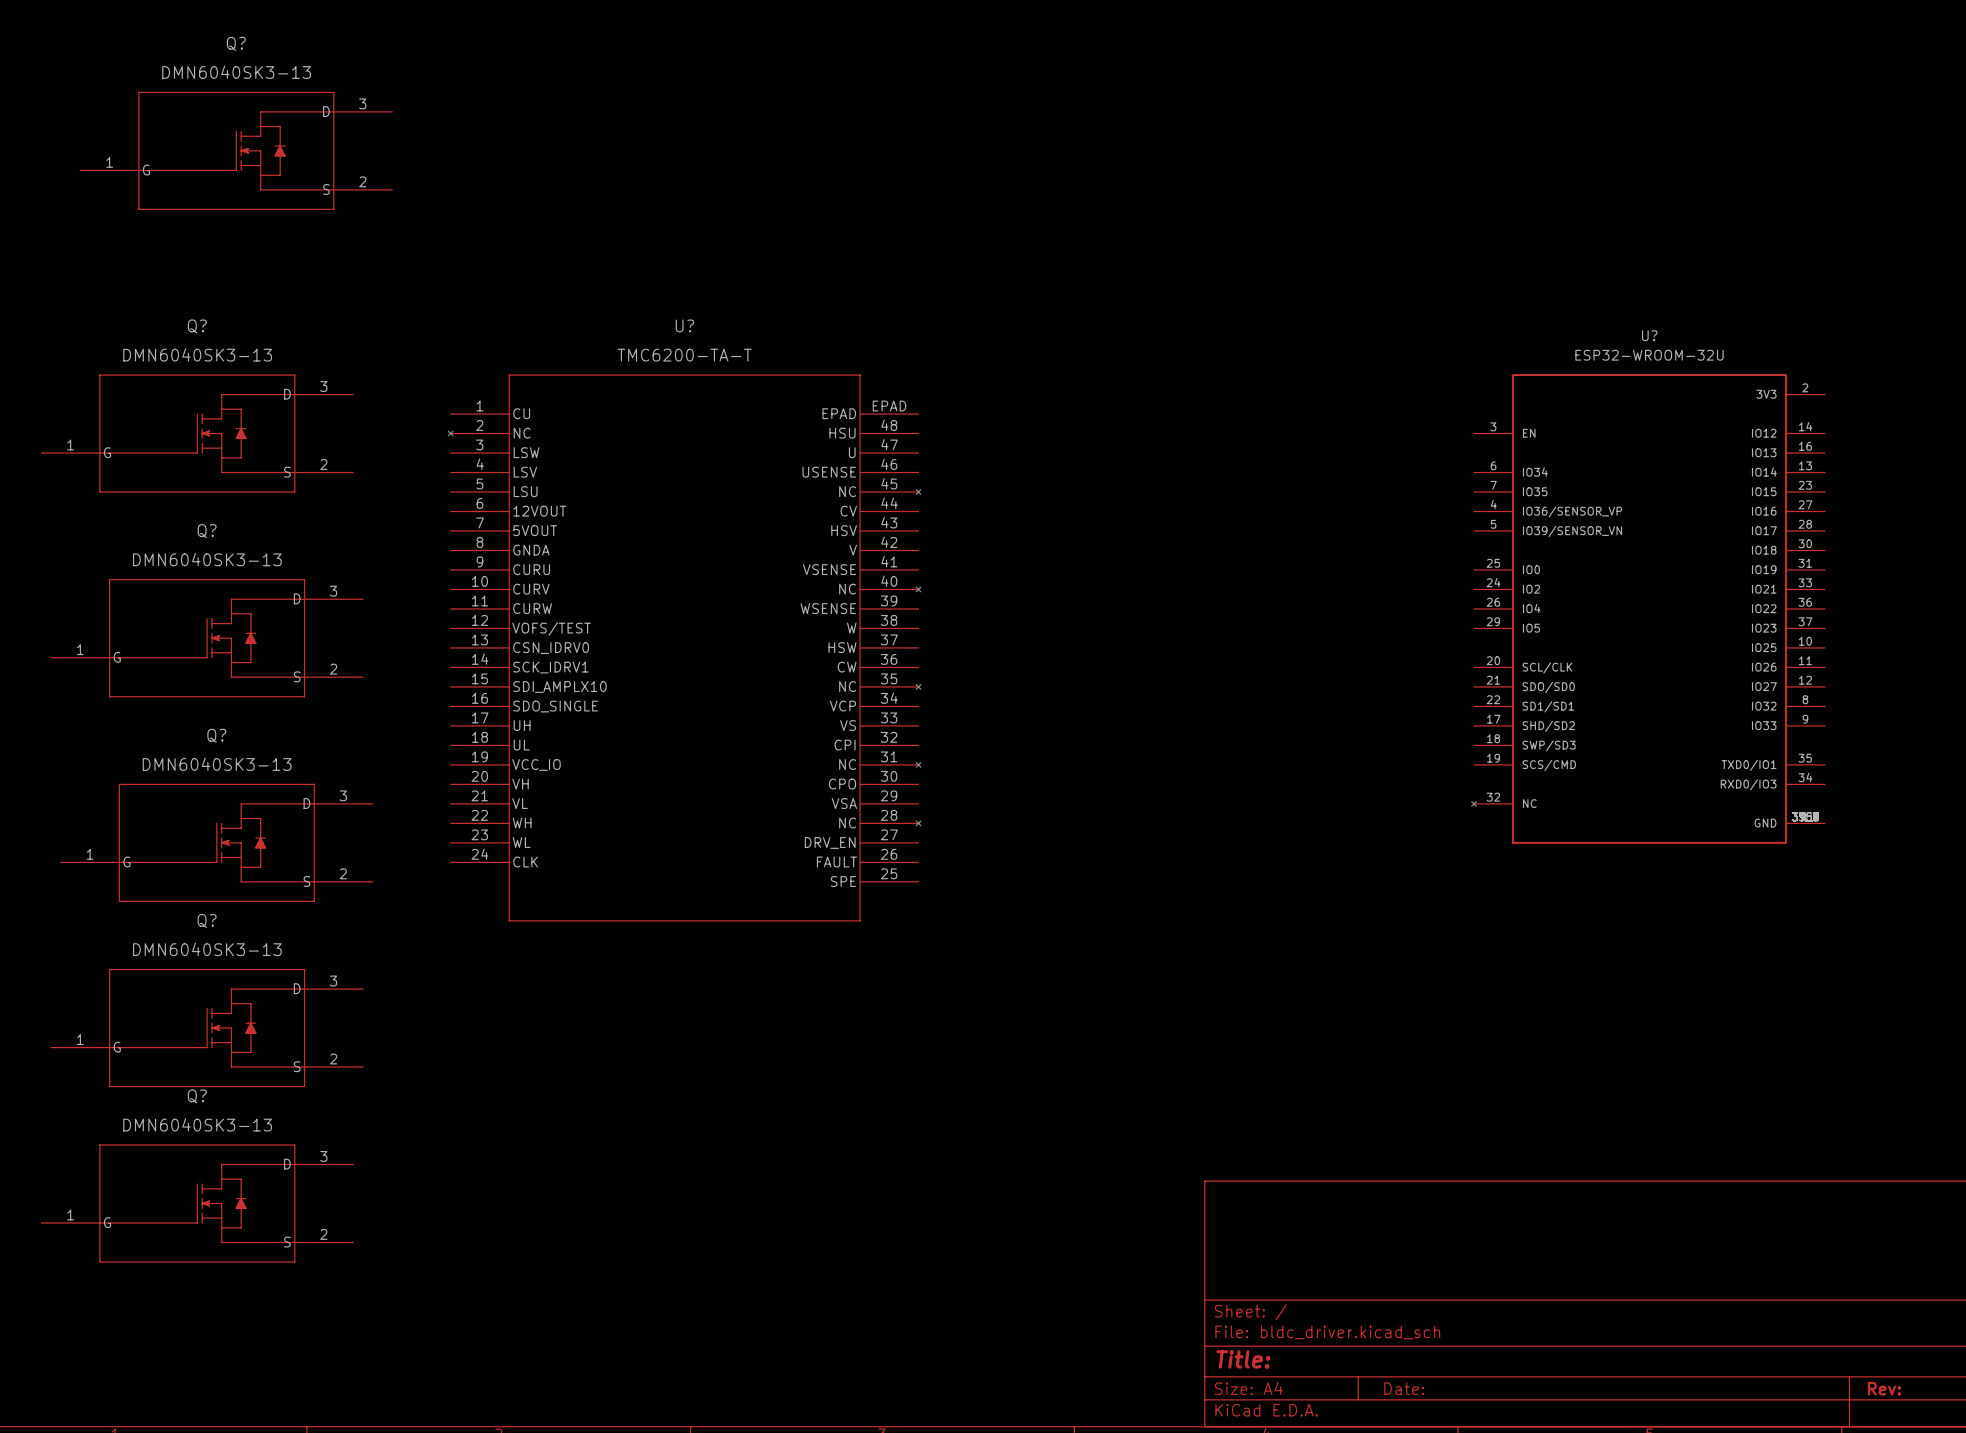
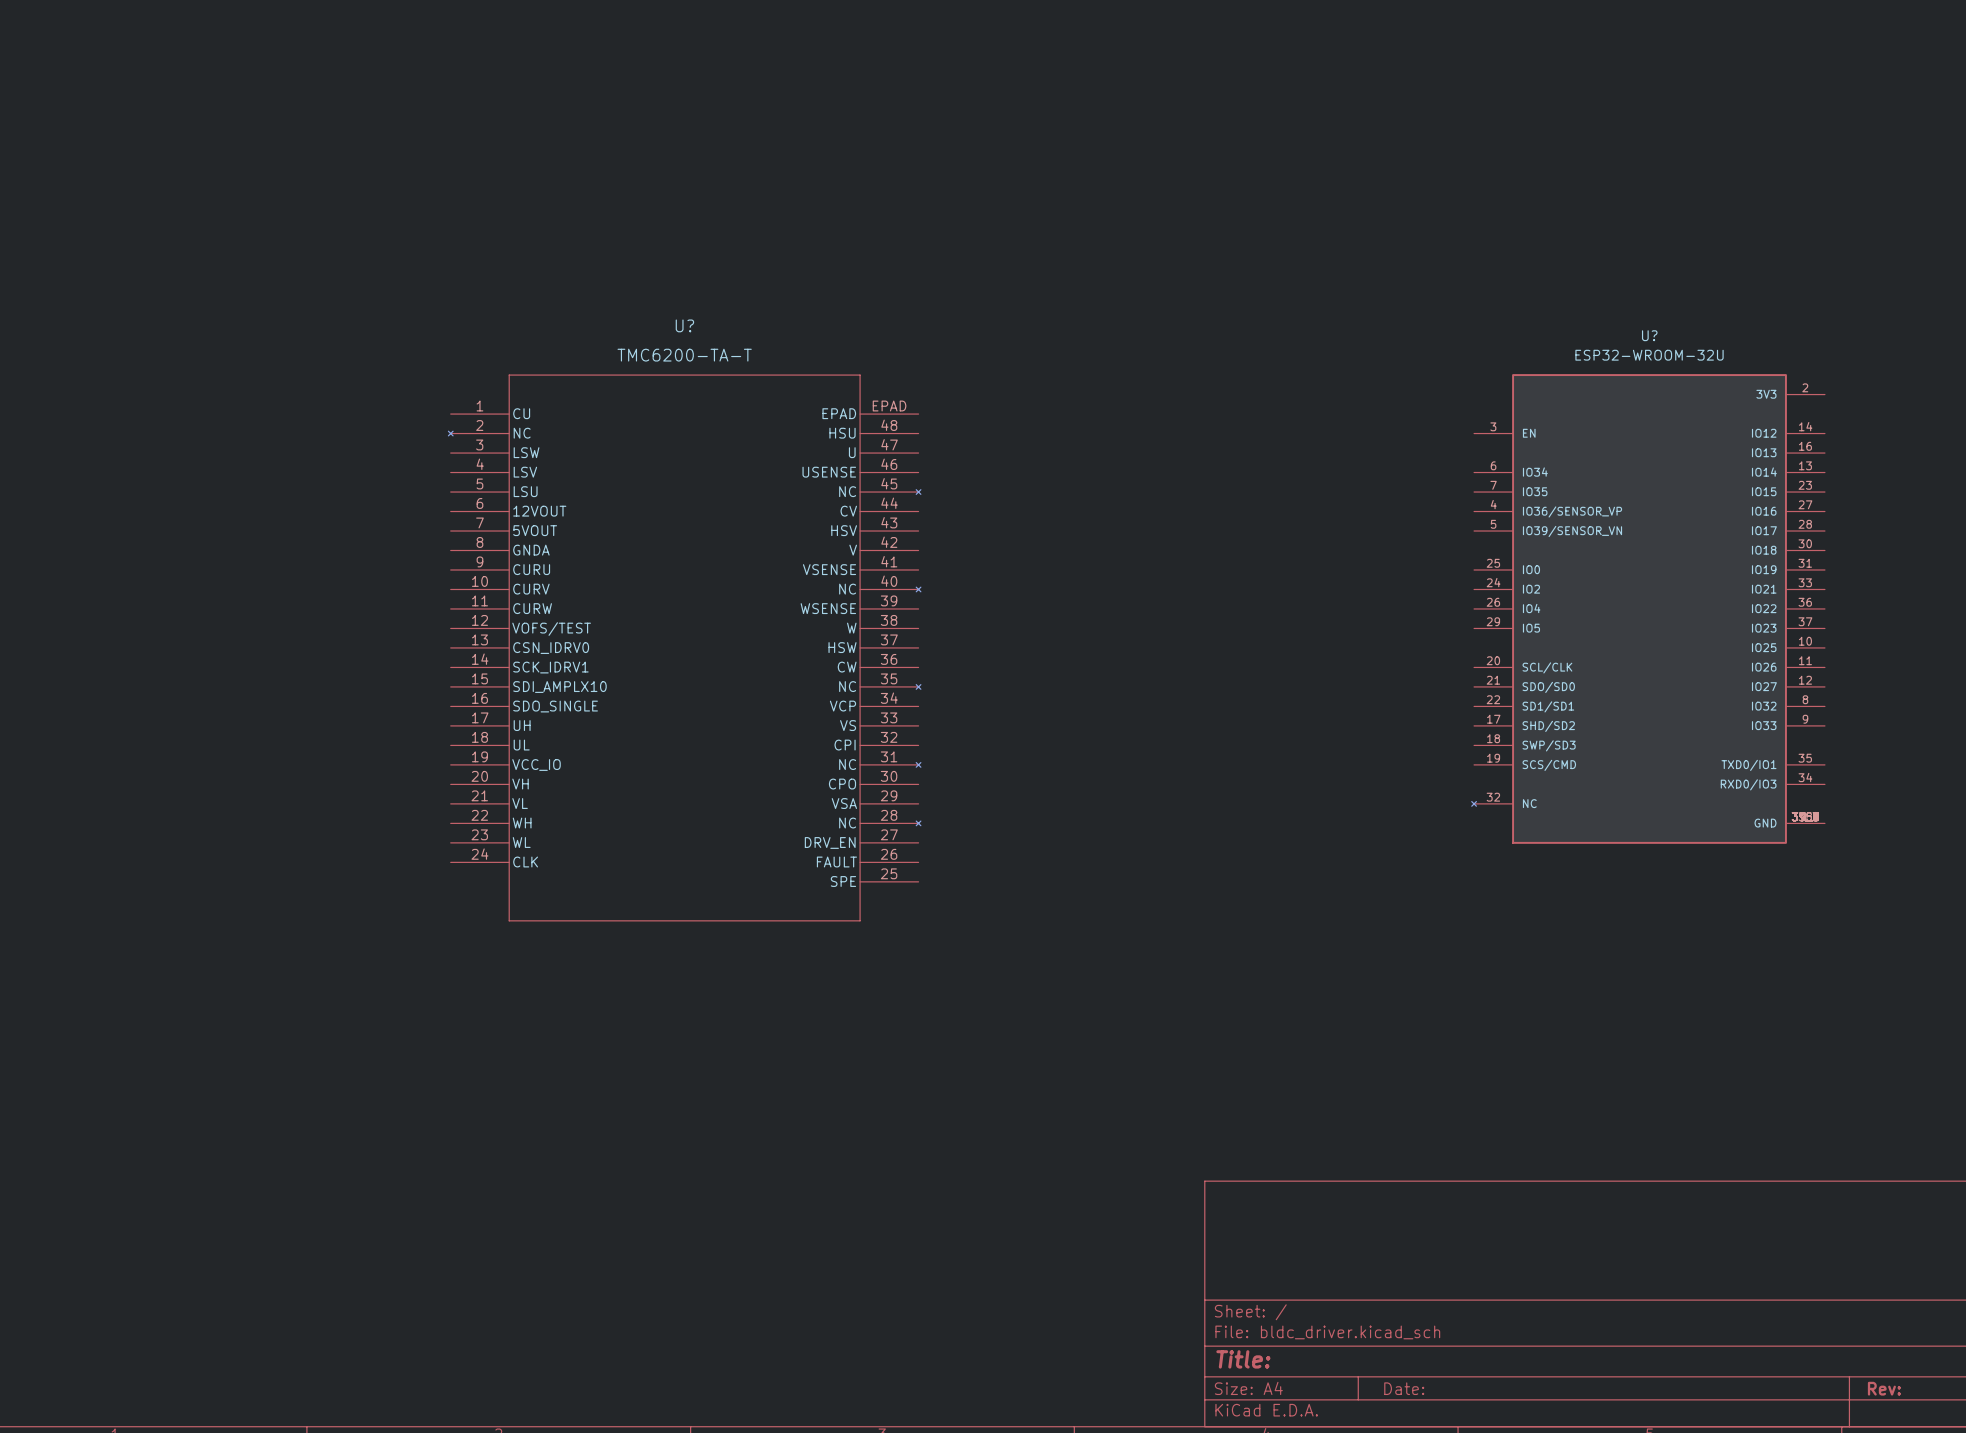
Q?: DMN6040SK3-13 (236, 150) -> none
Q?: DMN6040SK3-13 (197, 433) -> none
Q?: DMN6040SK3-13 (207, 638) -> none
Q?: DMN6040SK3-13 (216, 842) -> none
Q?: DMN6040SK3-13 (207, 1028) -> none
Q?: DMN6040SK3-13 (197, 1203) -> none

